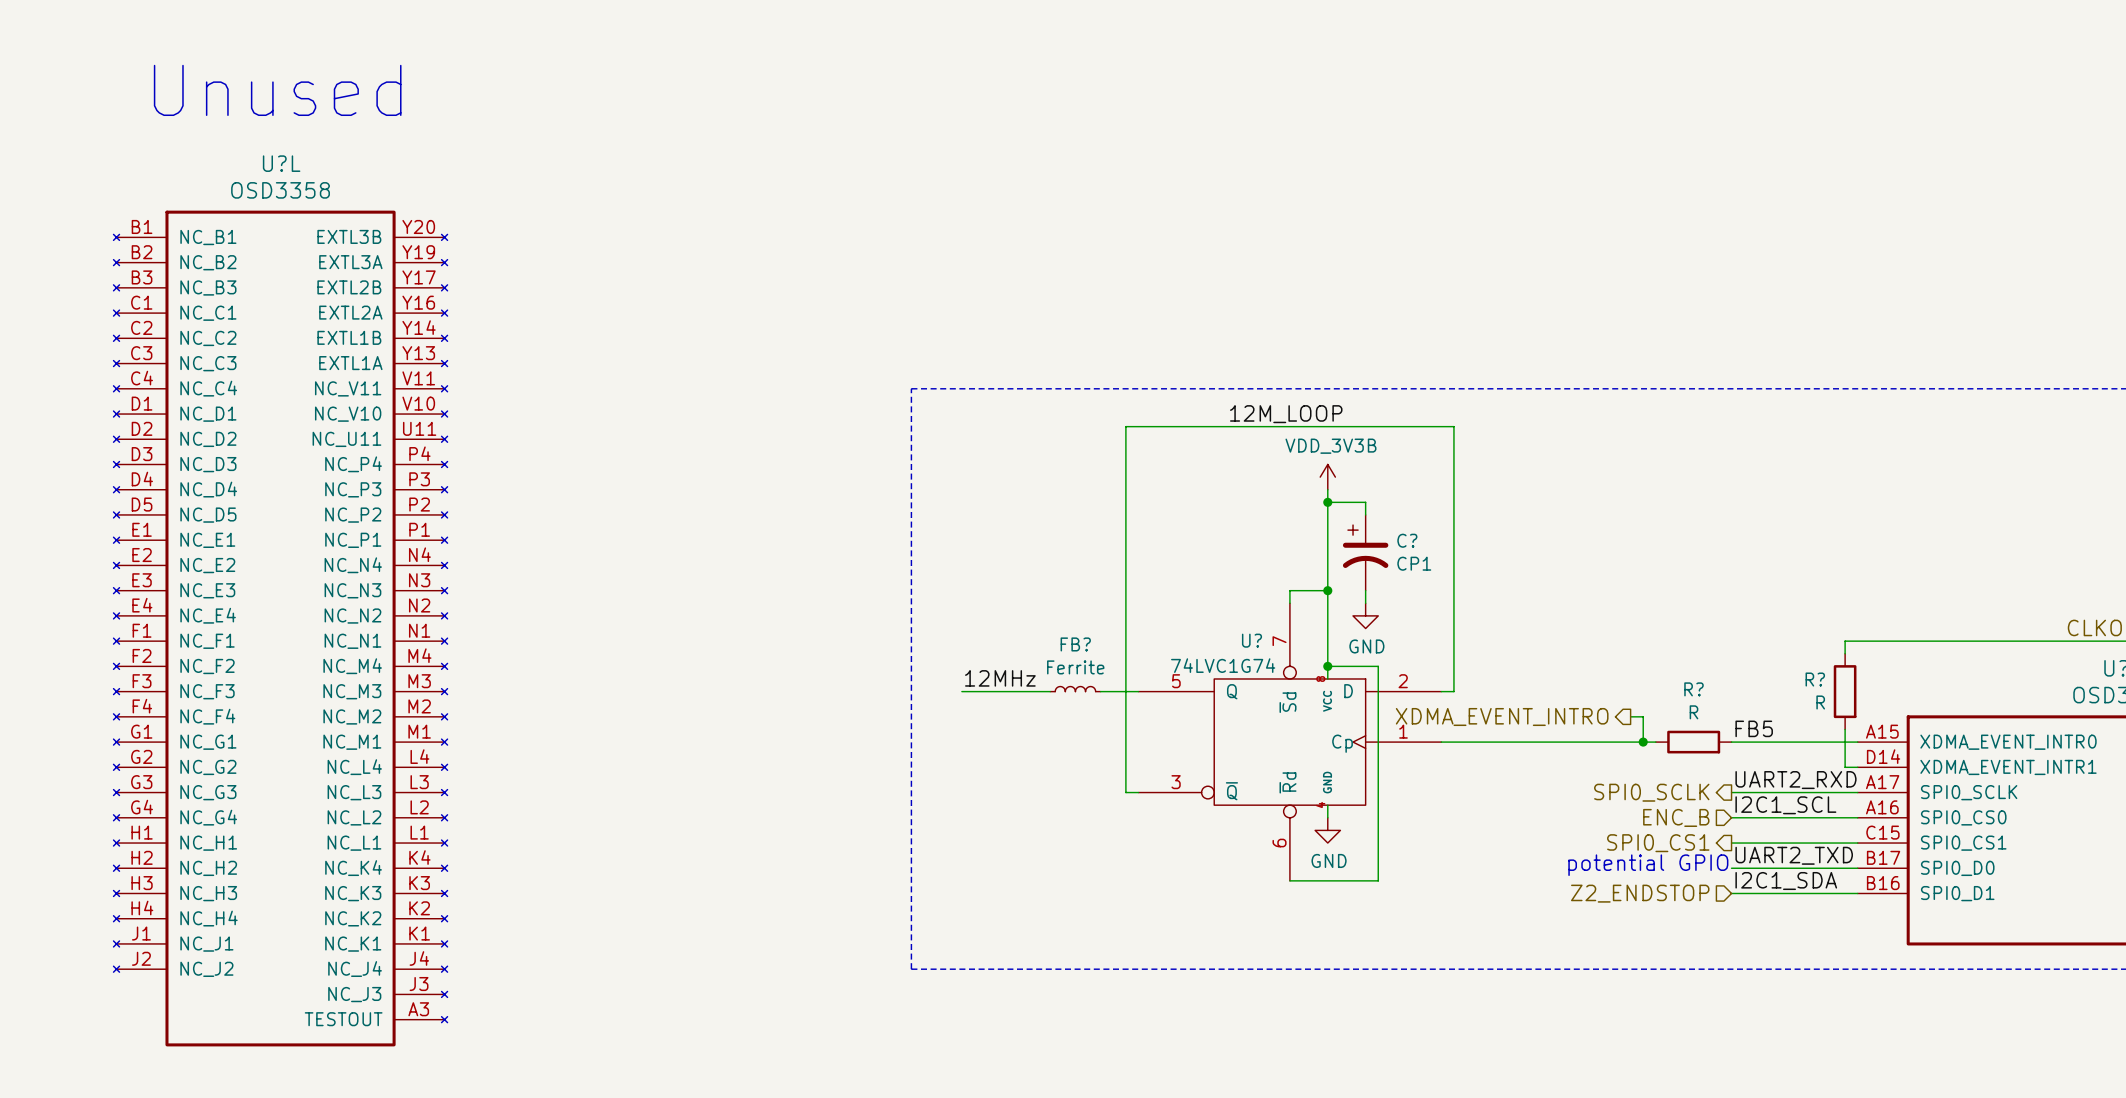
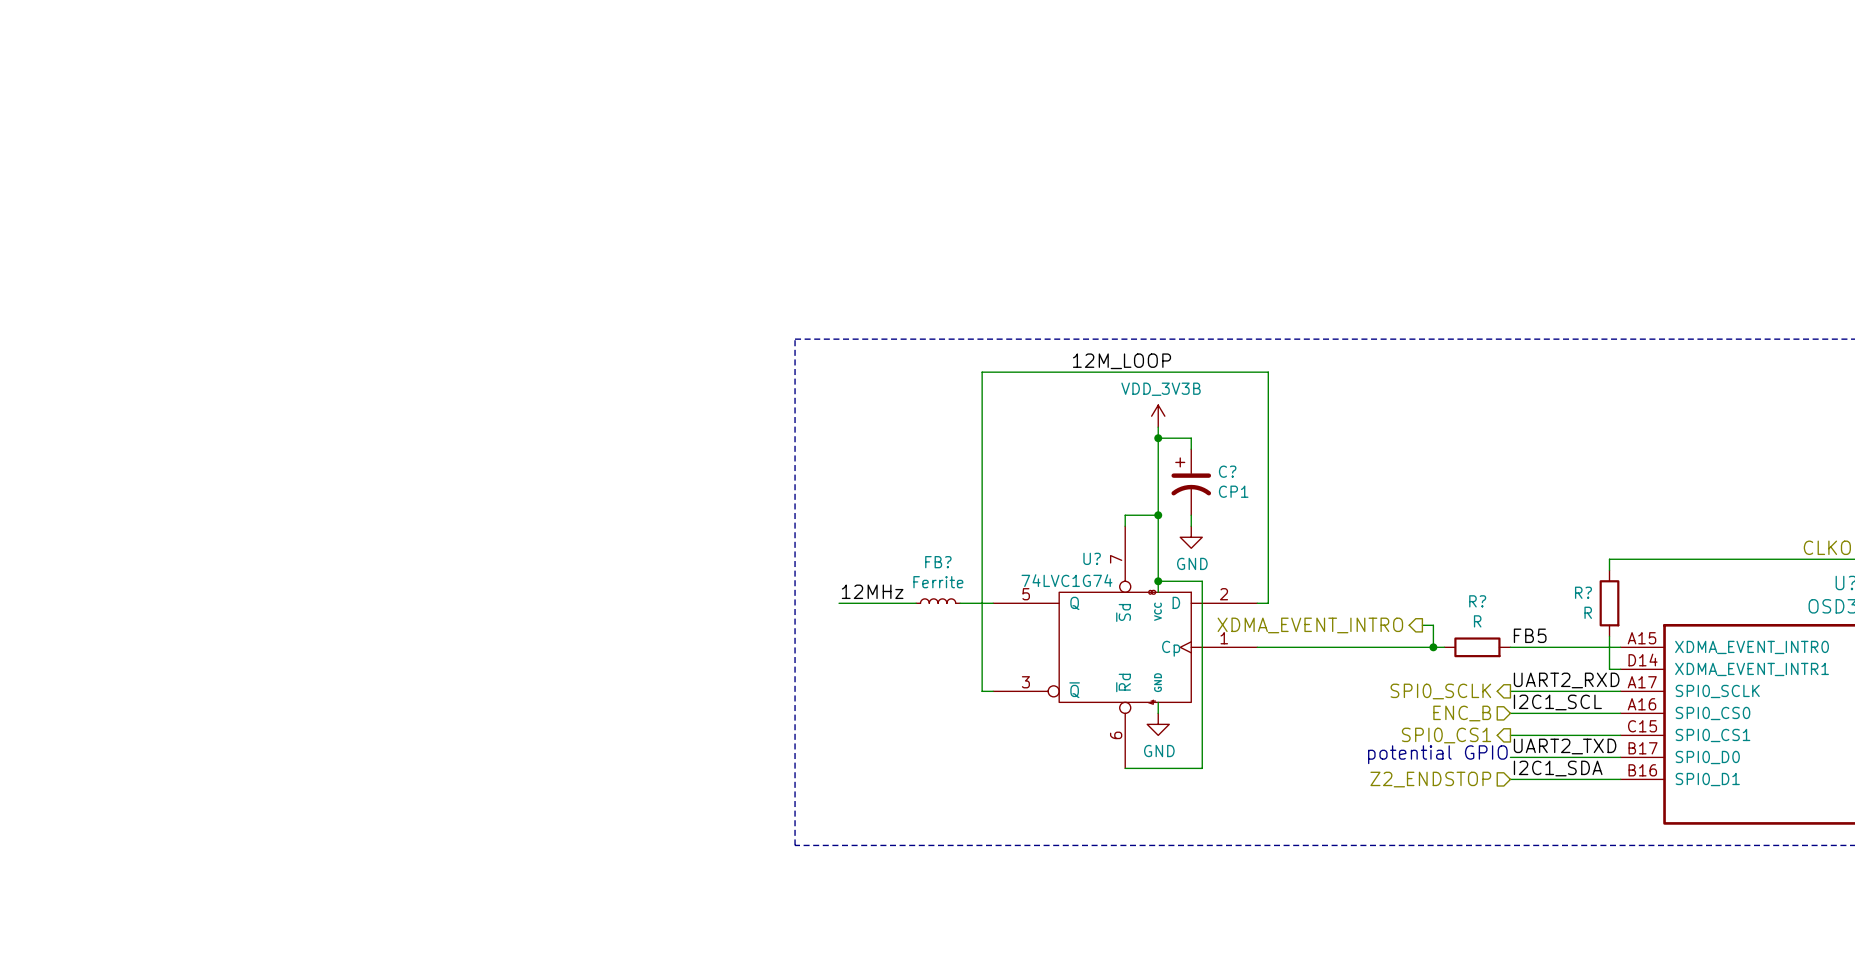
text: Unused (277, 90) -> none
U?L: OSD3358 (280, 628) -> none

